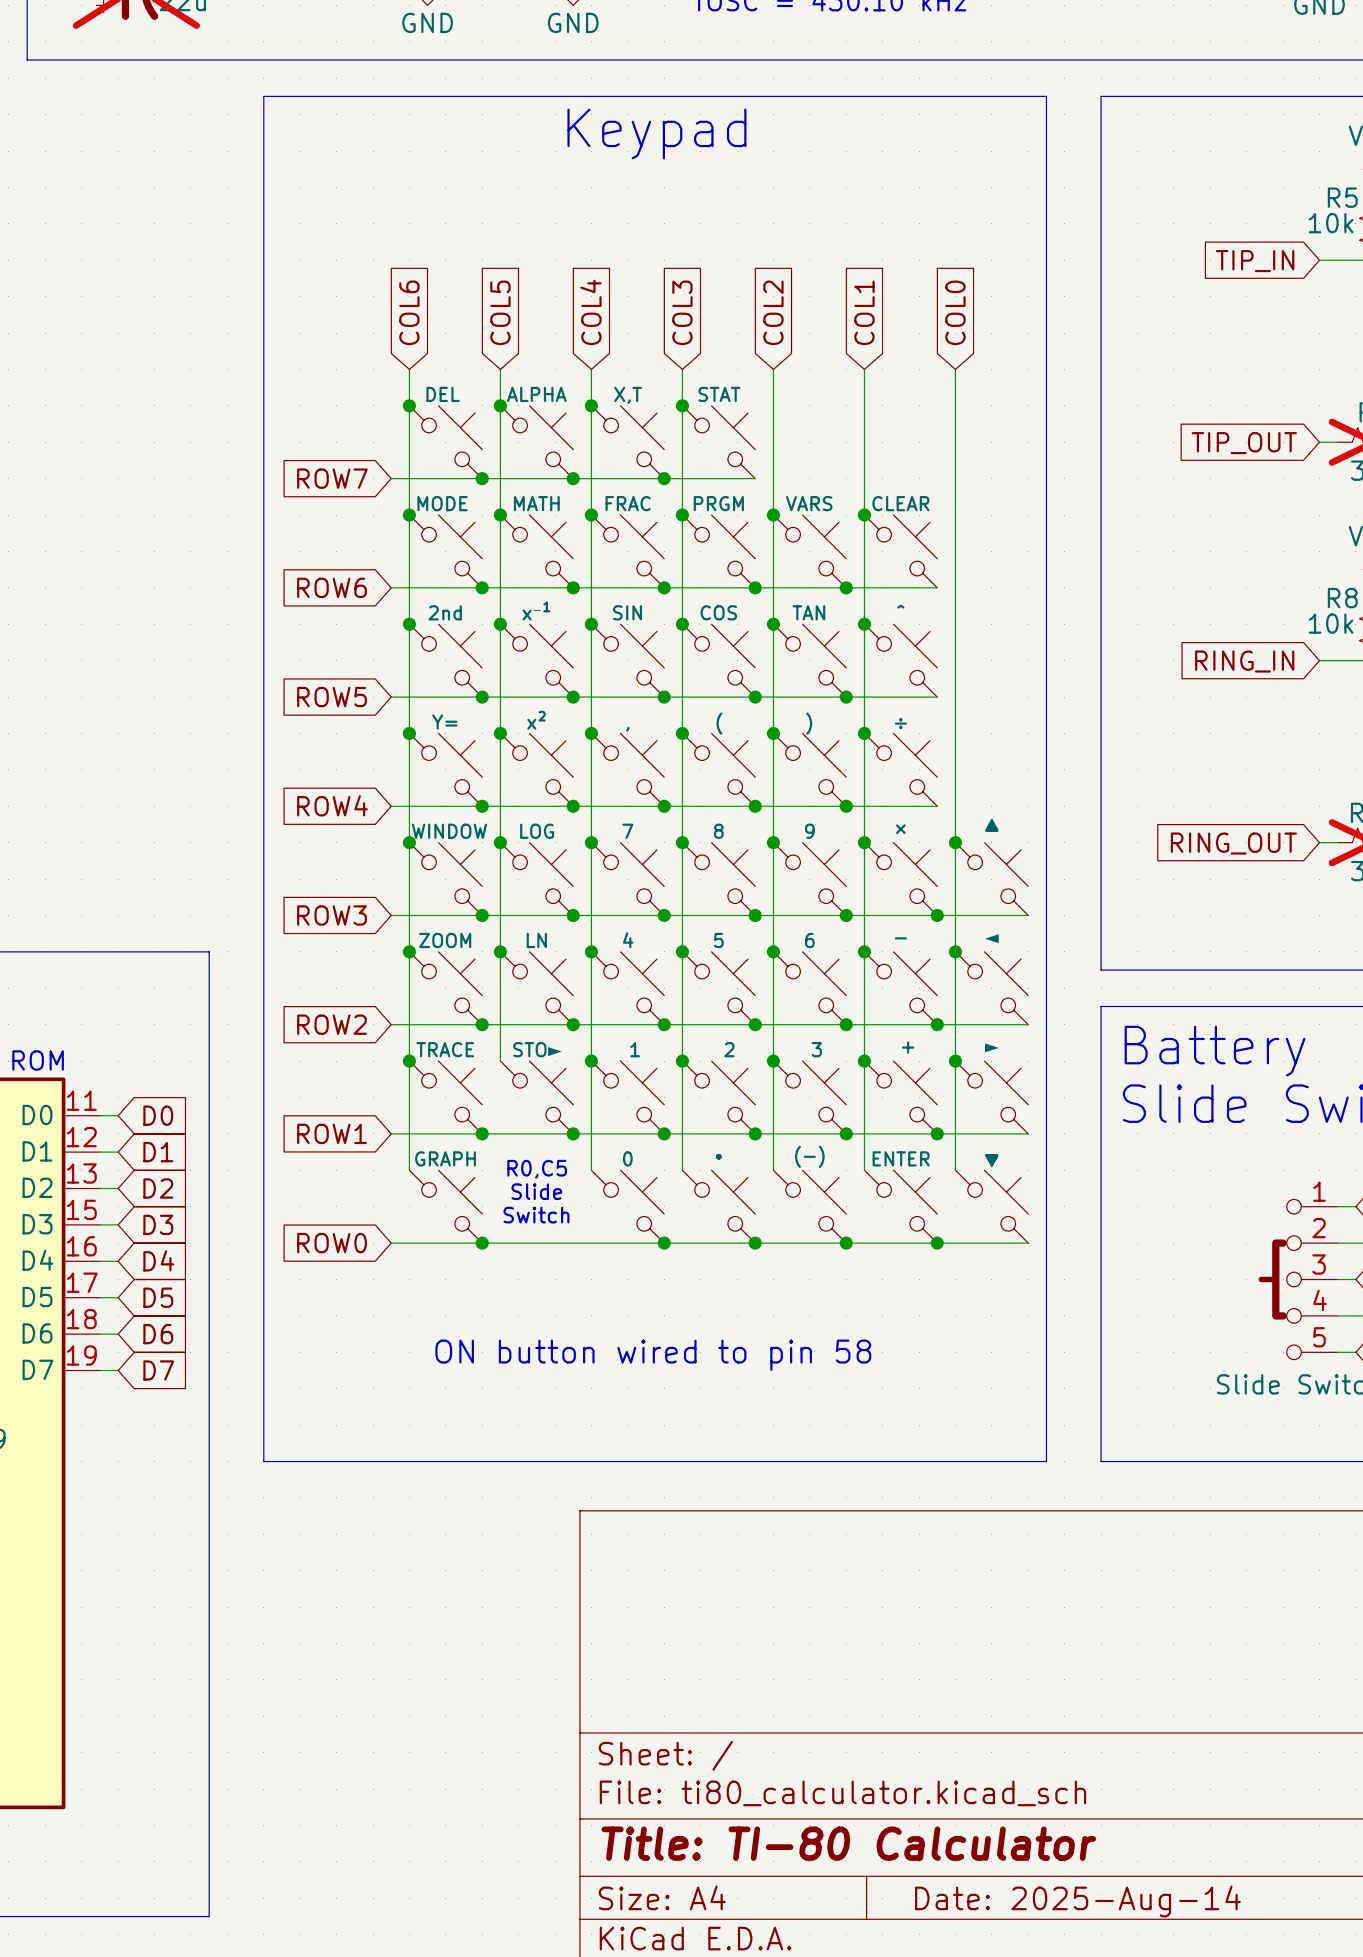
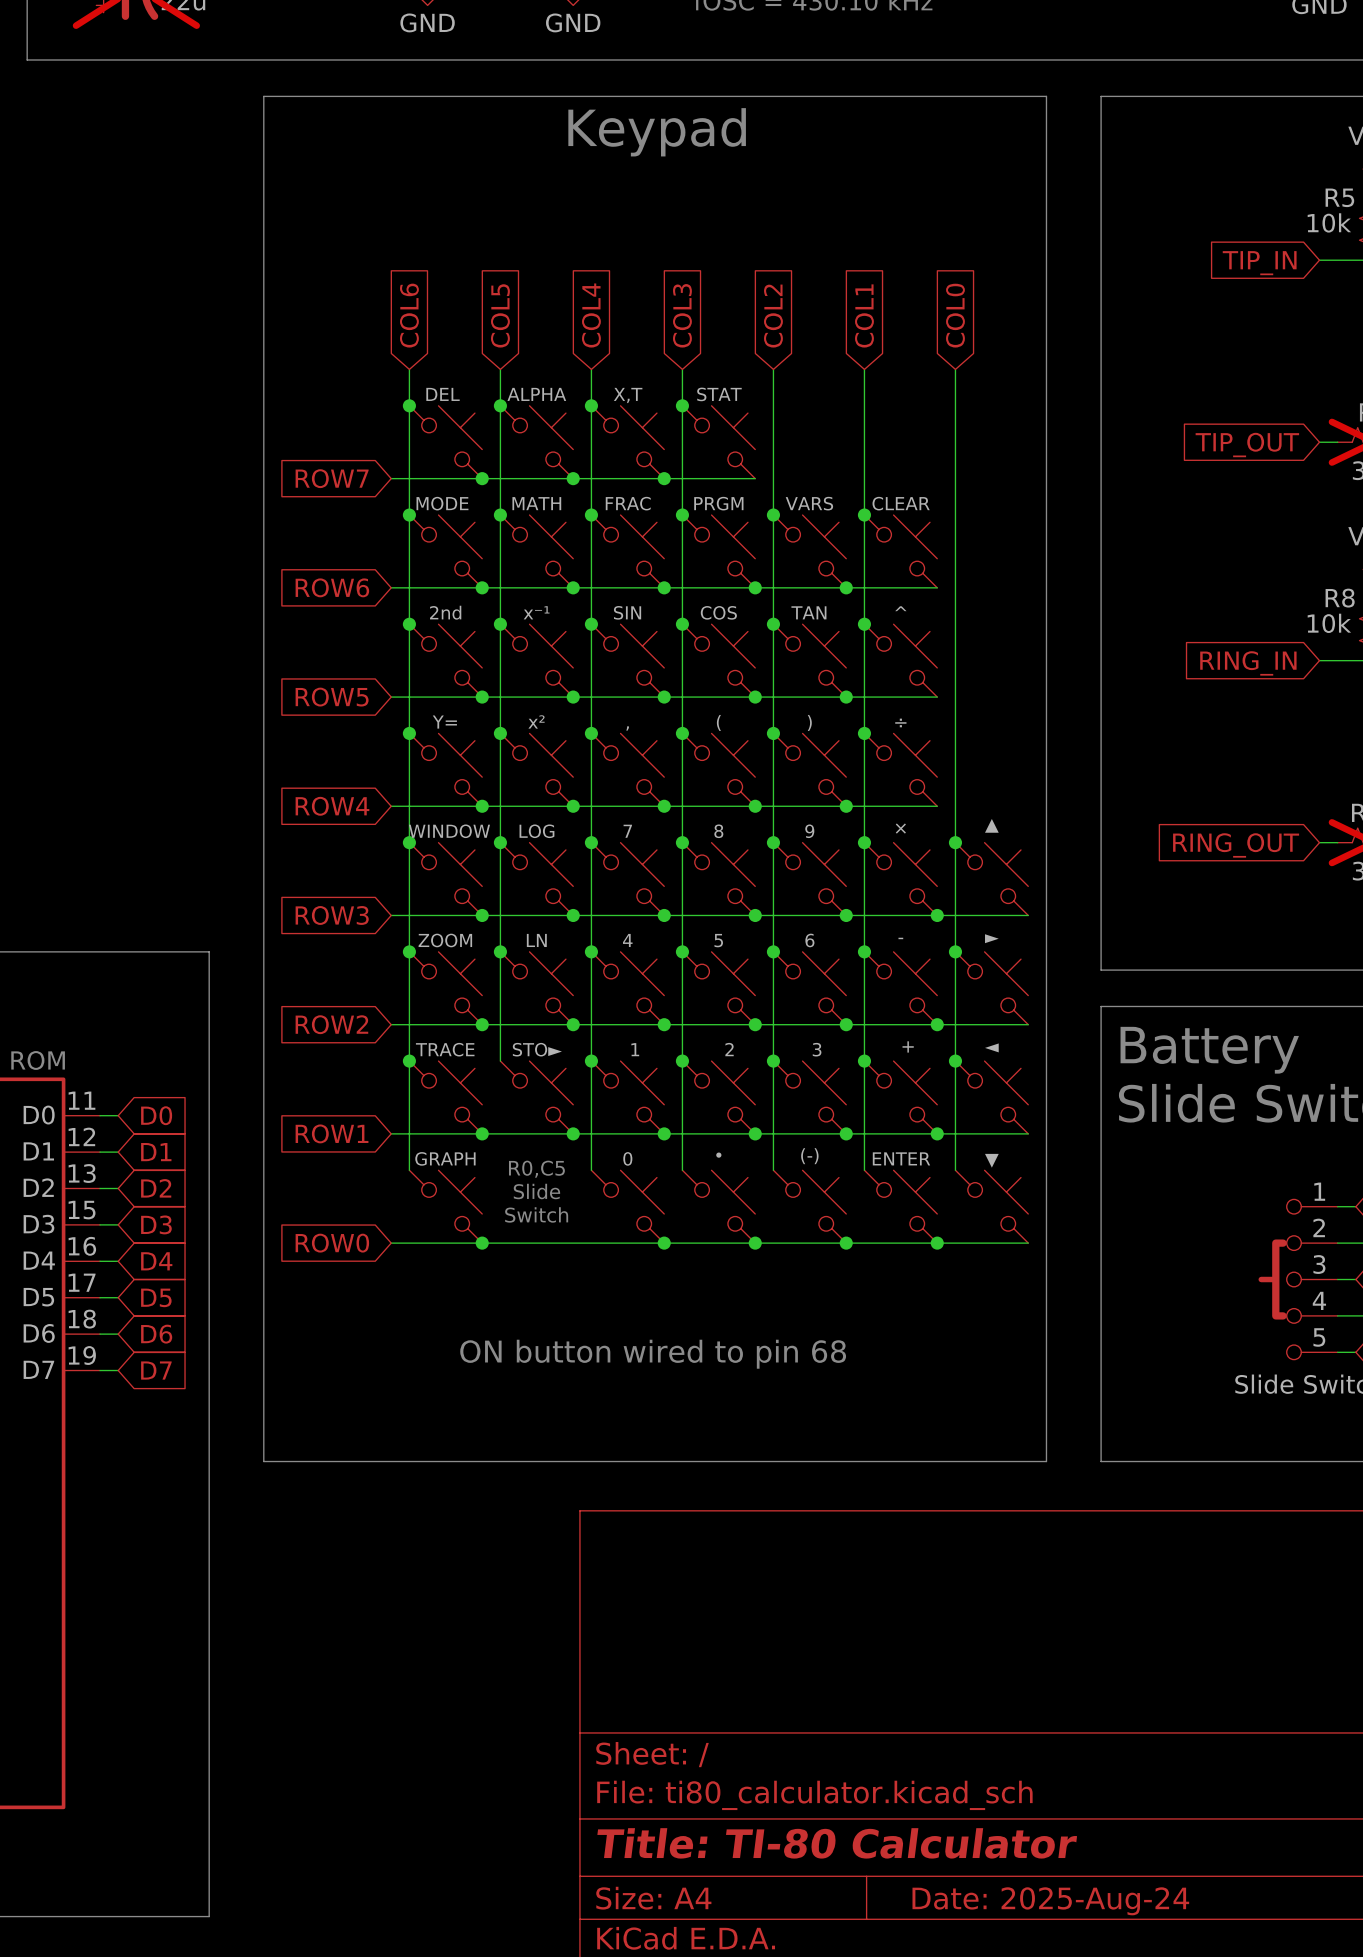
part value: ◄ (991, 938) -> ► (991, 938)
part value: ► (991, 1047) -> ◄ (991, 1047)
text: ON button wired to pin 58 (653, 1355) -> ON button wired to pin 68 (653, 1354)
title block: Date: 2025-Aug-14 (1077, 1901) -> Date: 2025-Aug-24 (1050, 1901)

